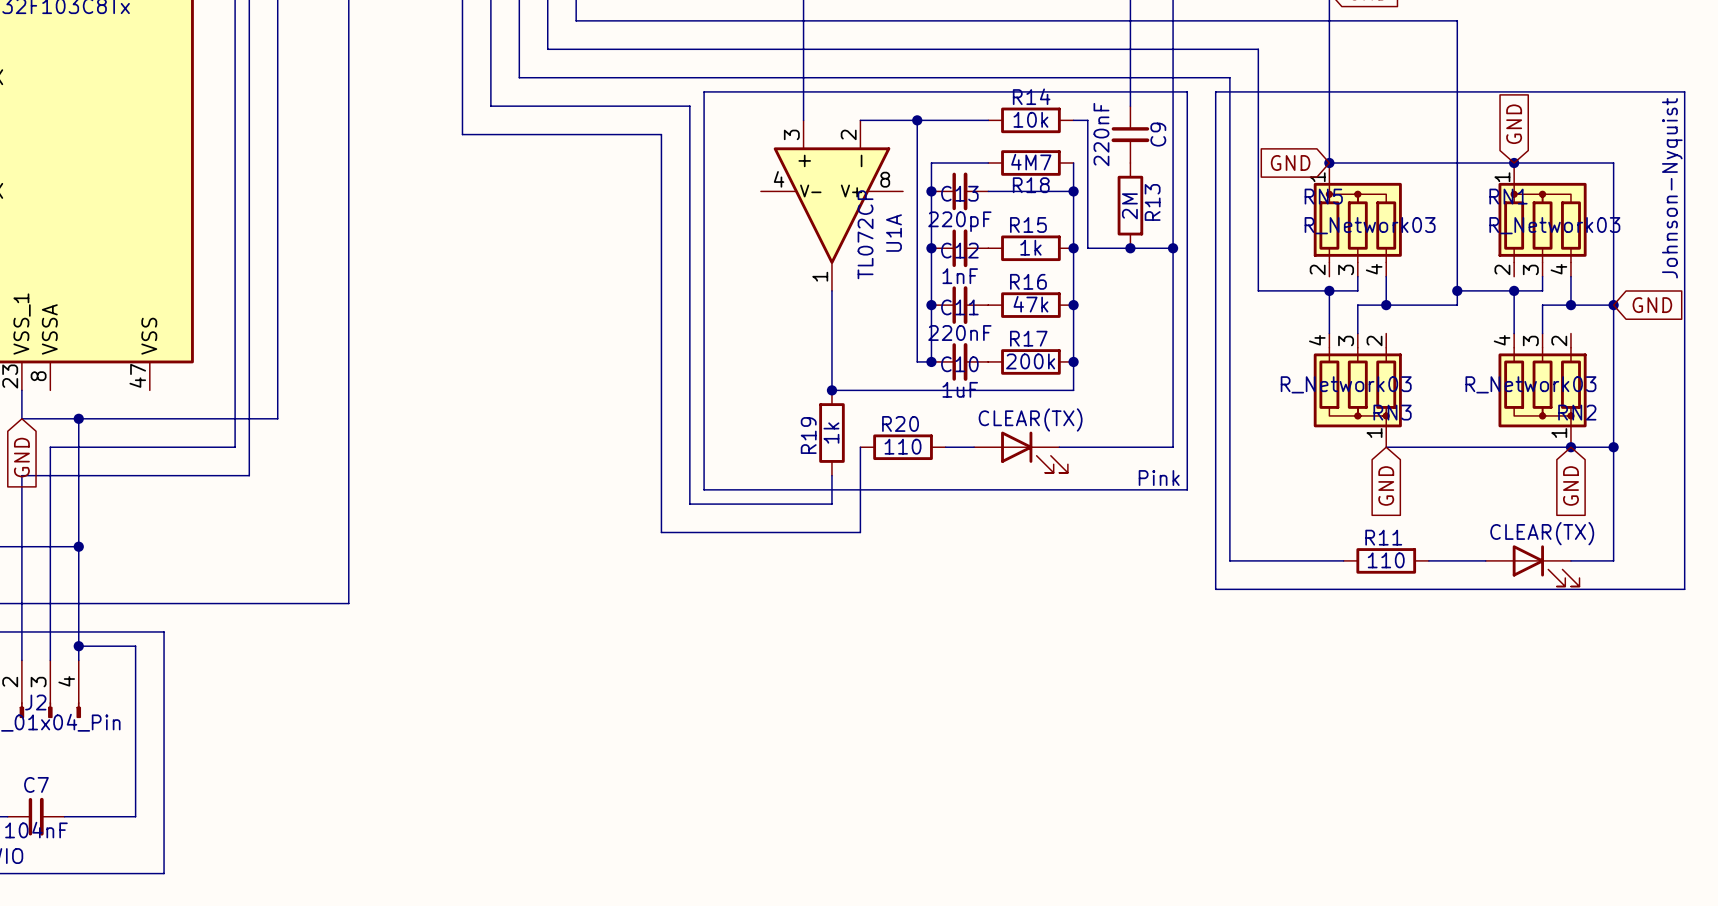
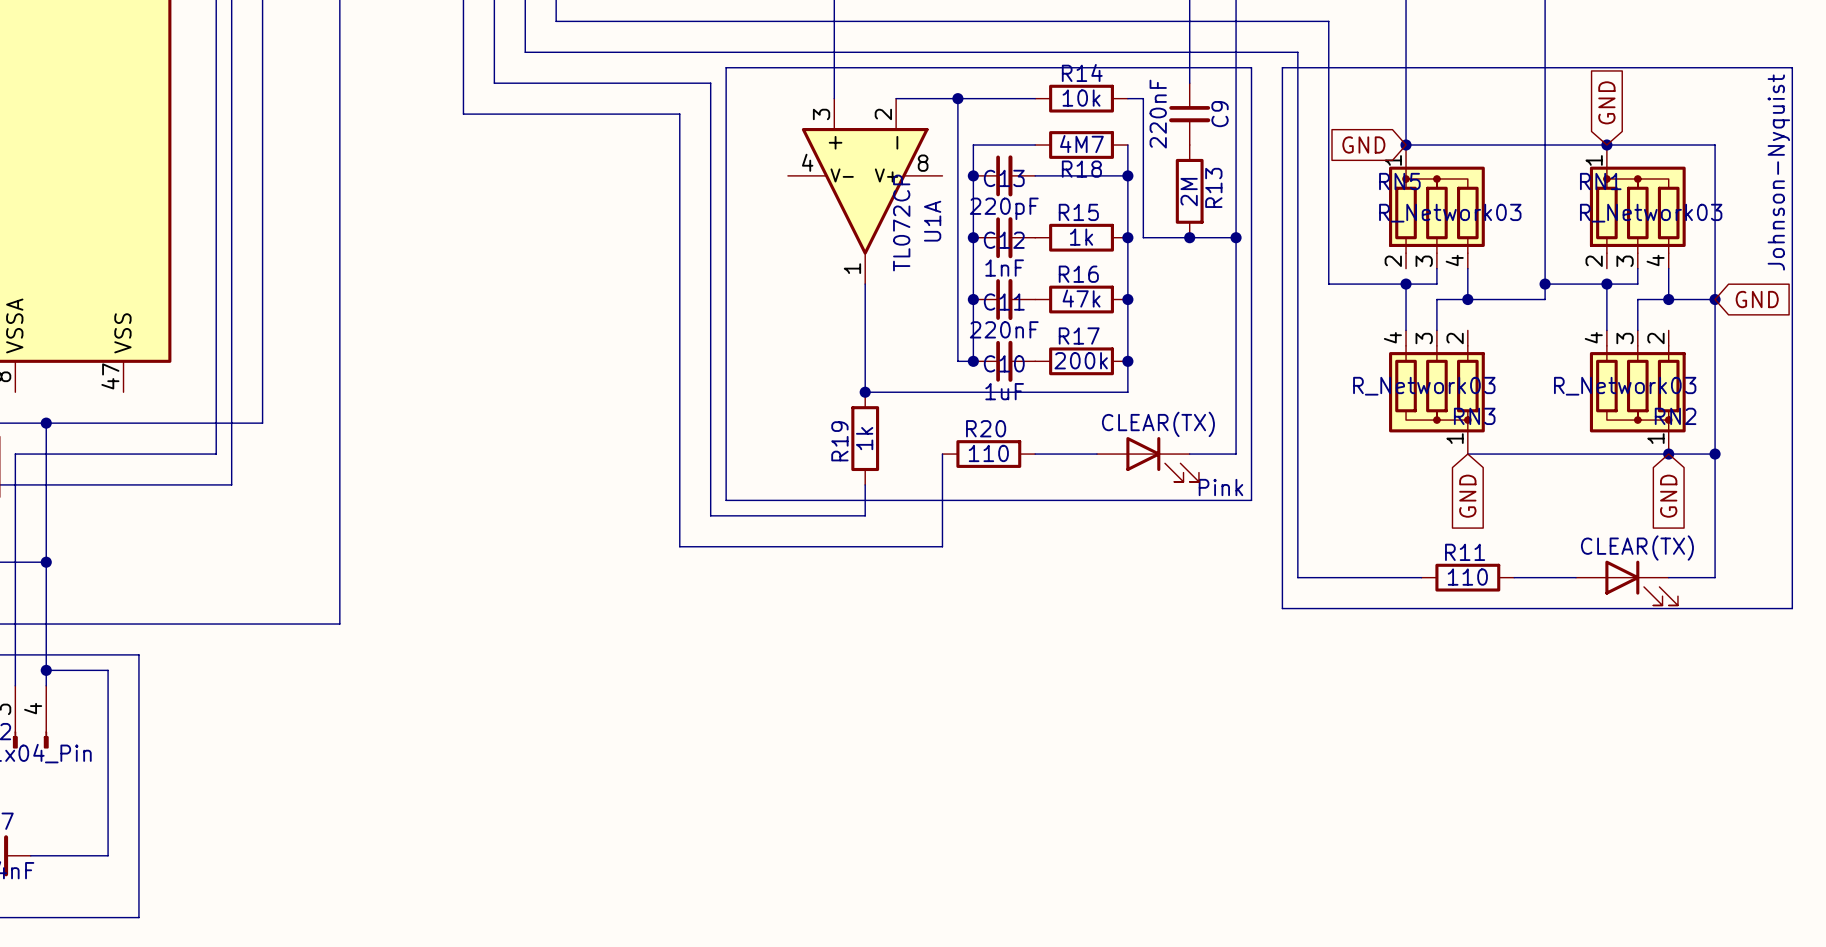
wire: (860, 447) (860, 532) -> (942, 454) (942, 546) (896, 546)
R20 position: (903, 447) -> (988, 454)
wire: (945, 447) (974, 447) -> none
part position: (1020, 452) -> (1147, 459)

